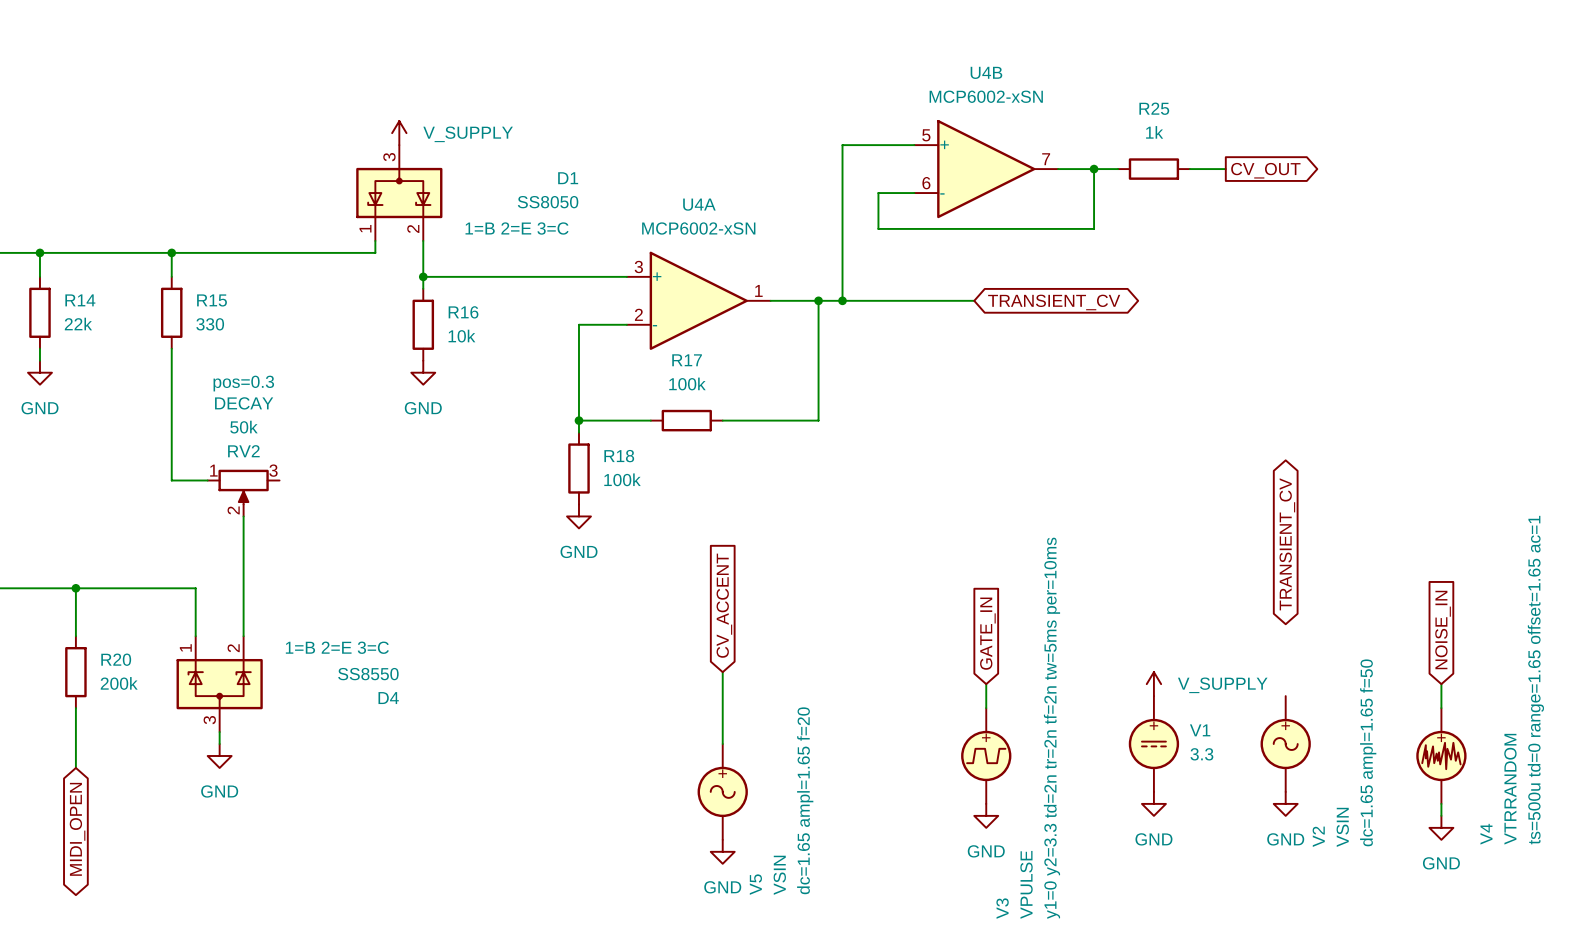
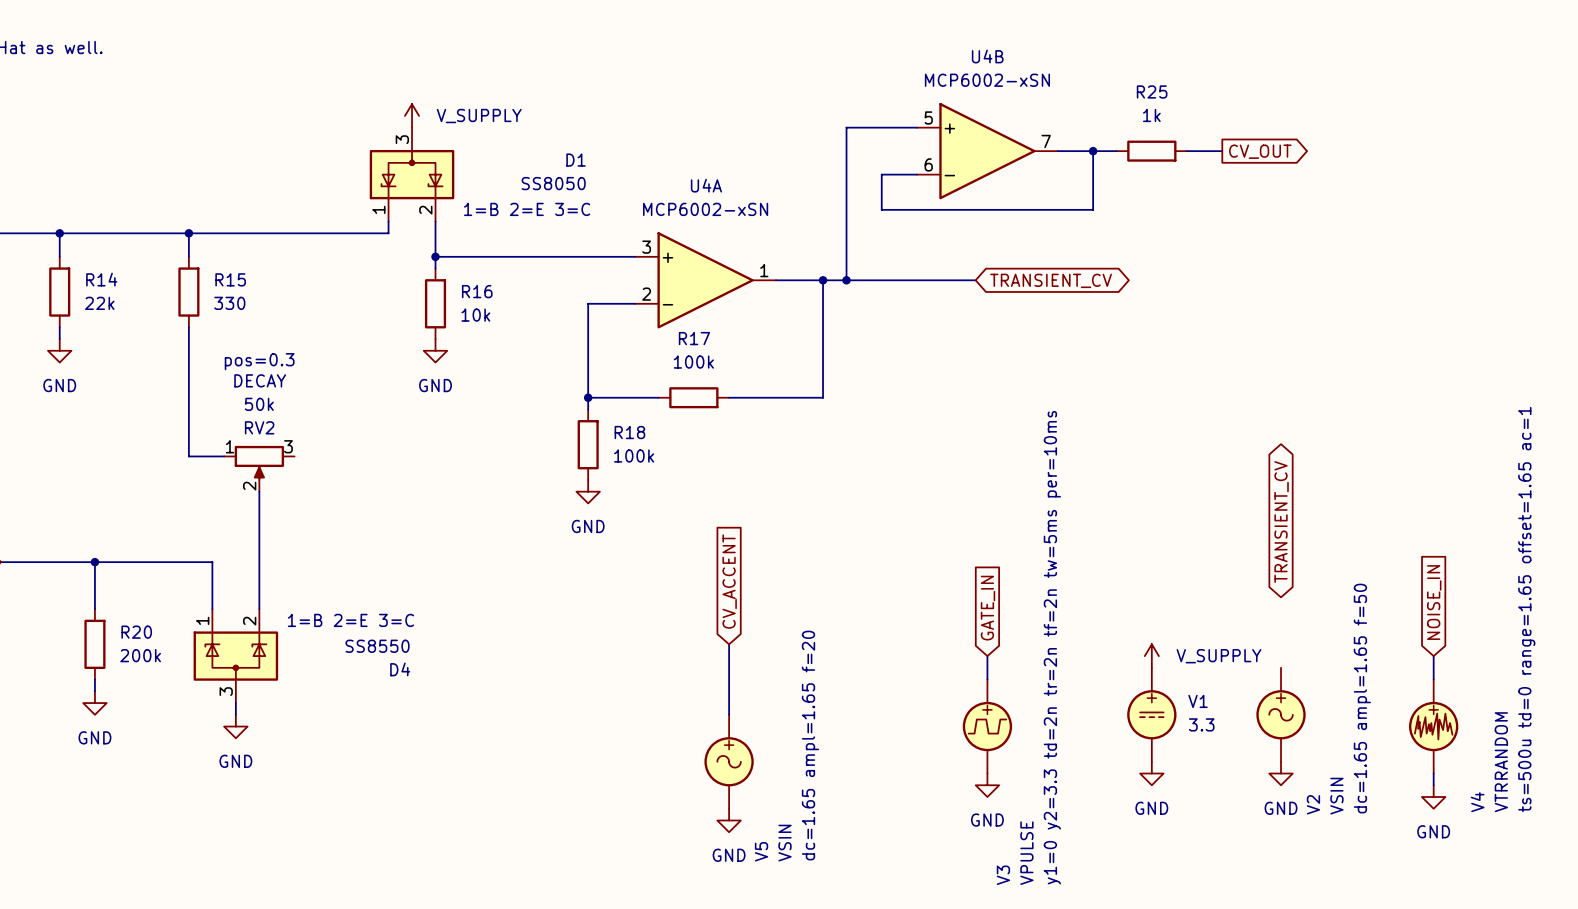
wire: (75, 720) (75, 767) -> none
power symbol: none -> GND (94, 703)
global label: MIDI_OPEN (77, 829) -> none

